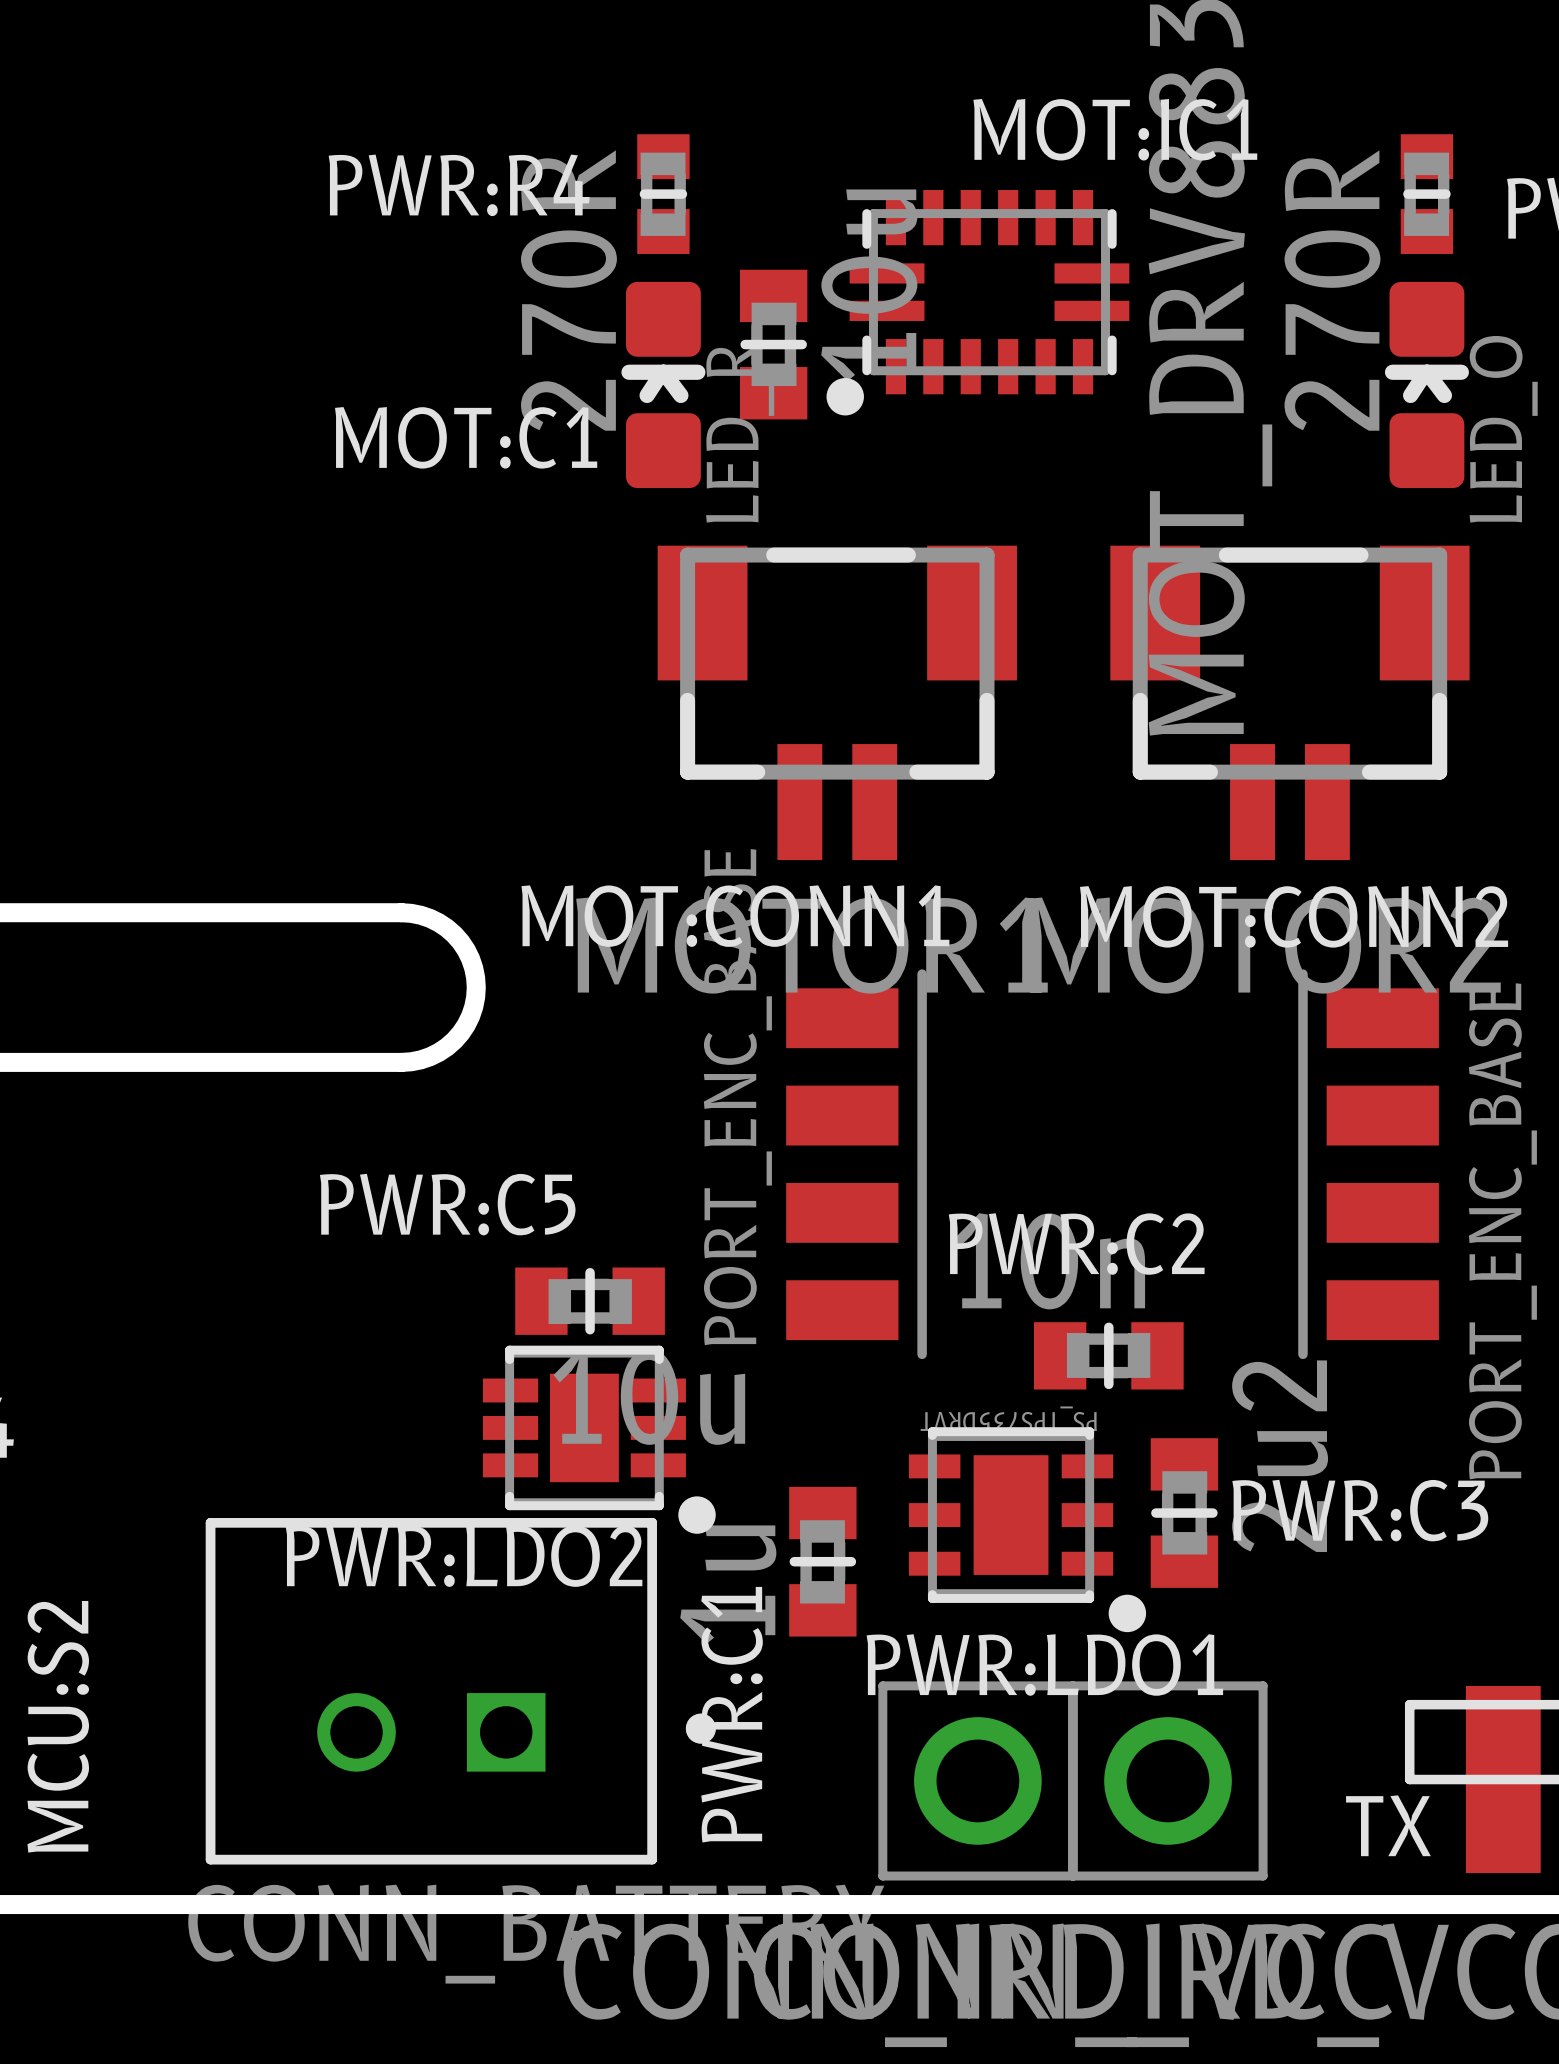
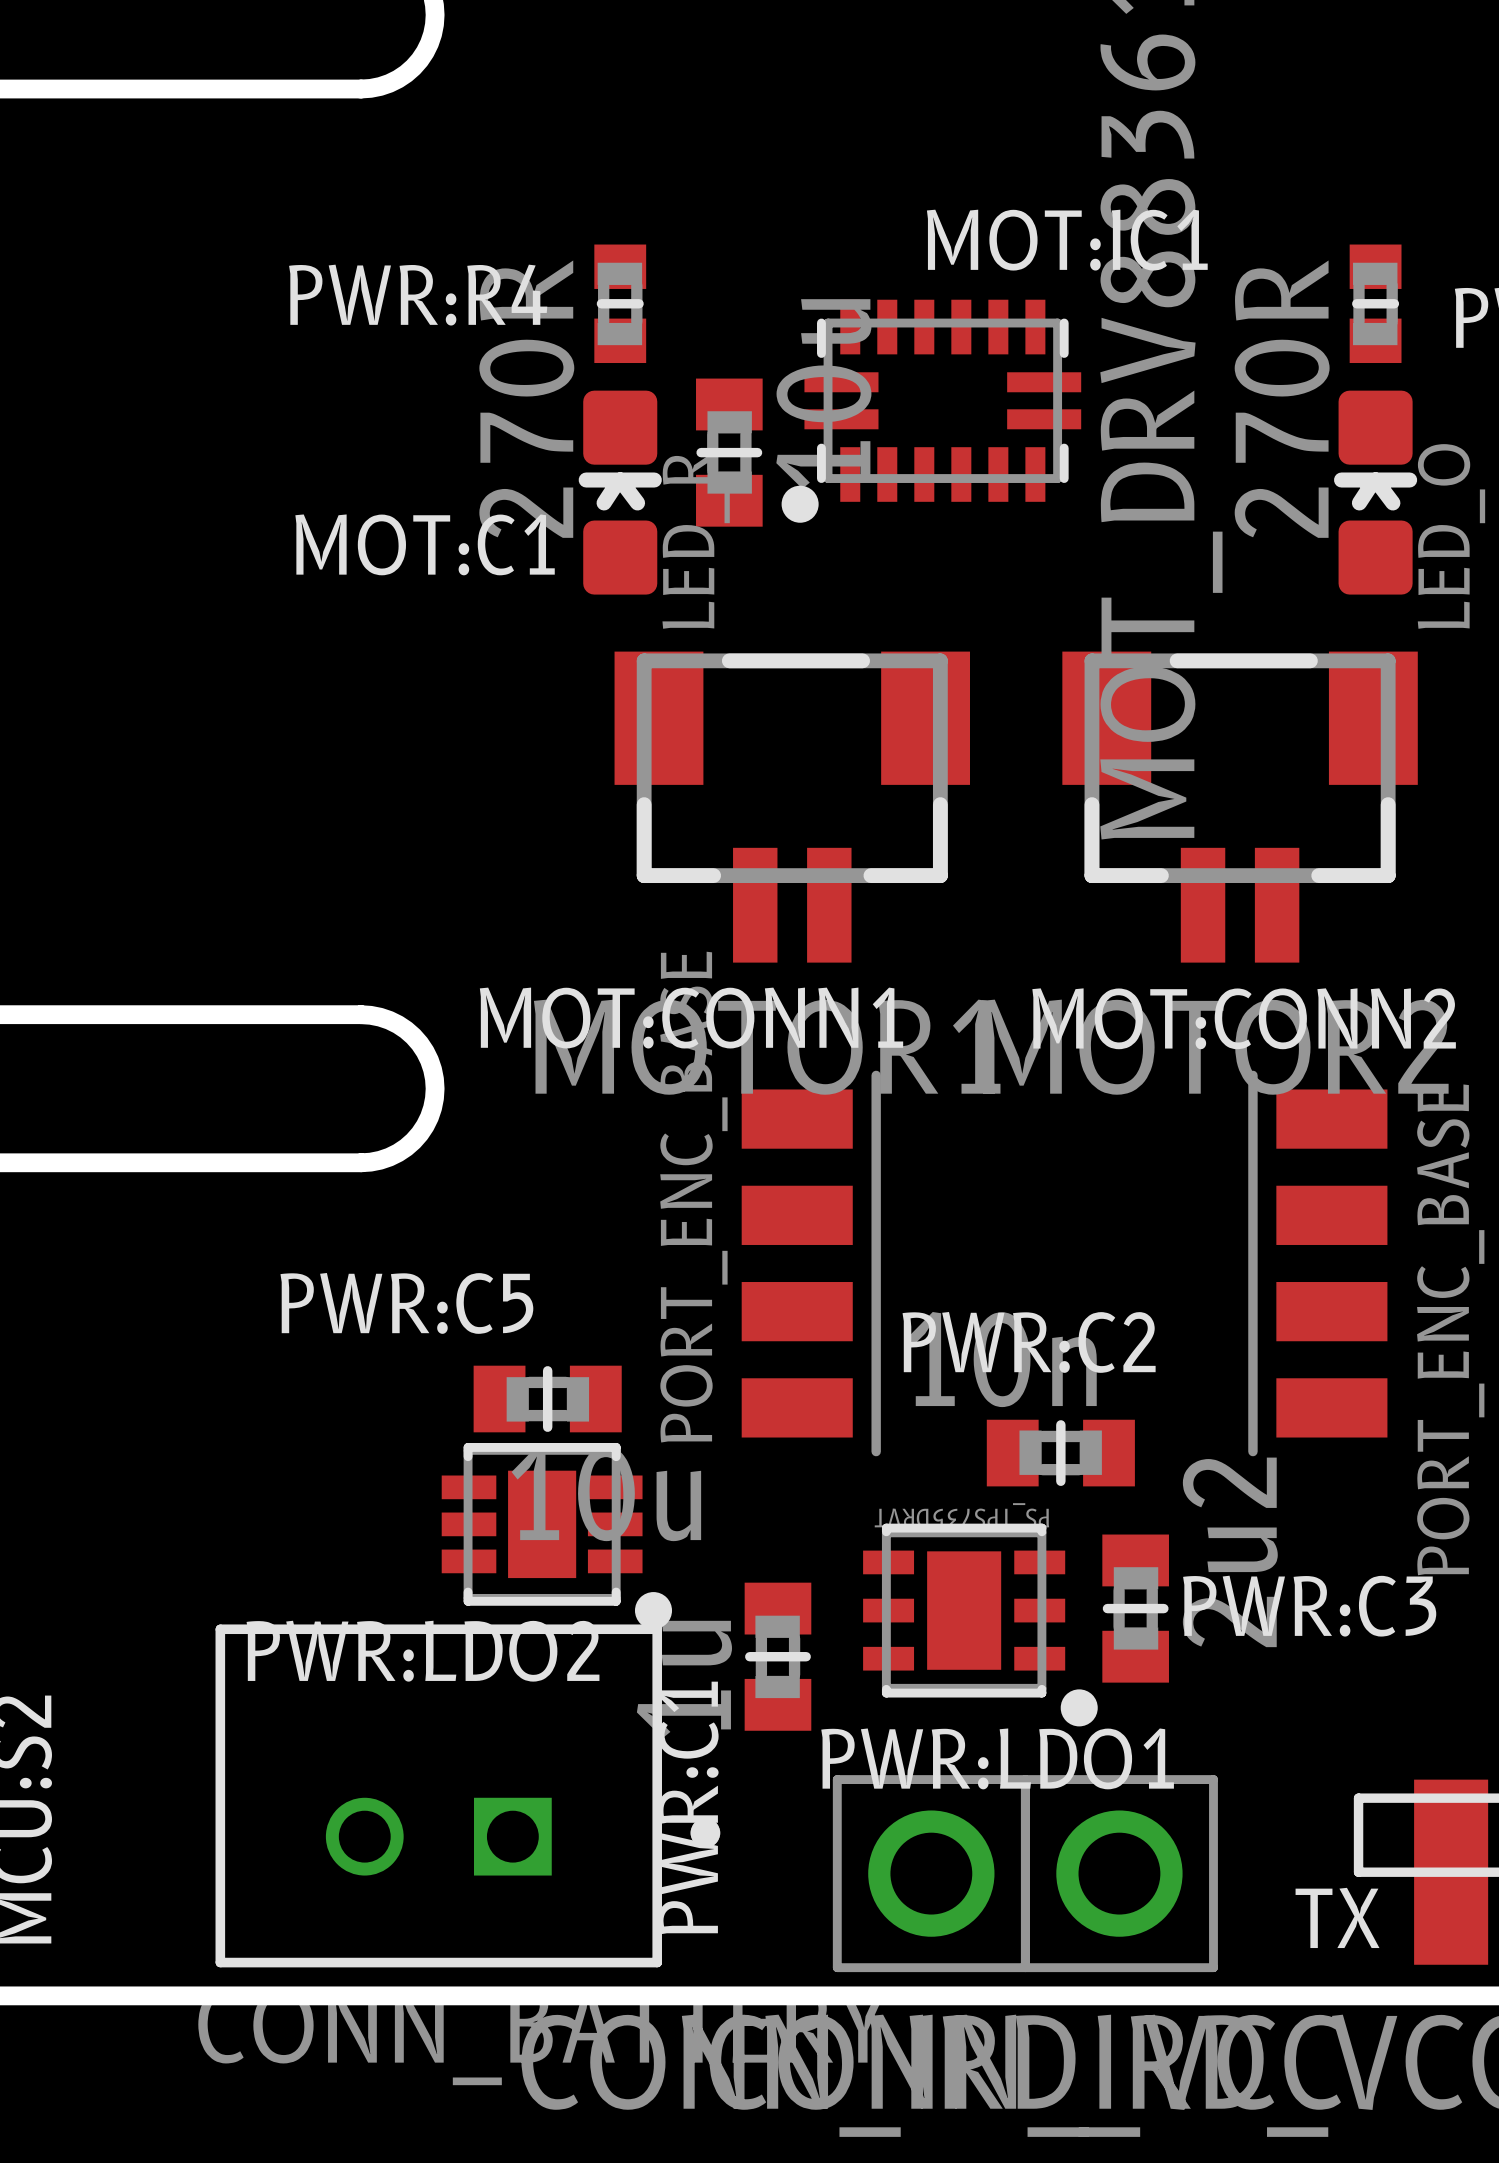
part position: (460, 1691) -> (467, 1795)

